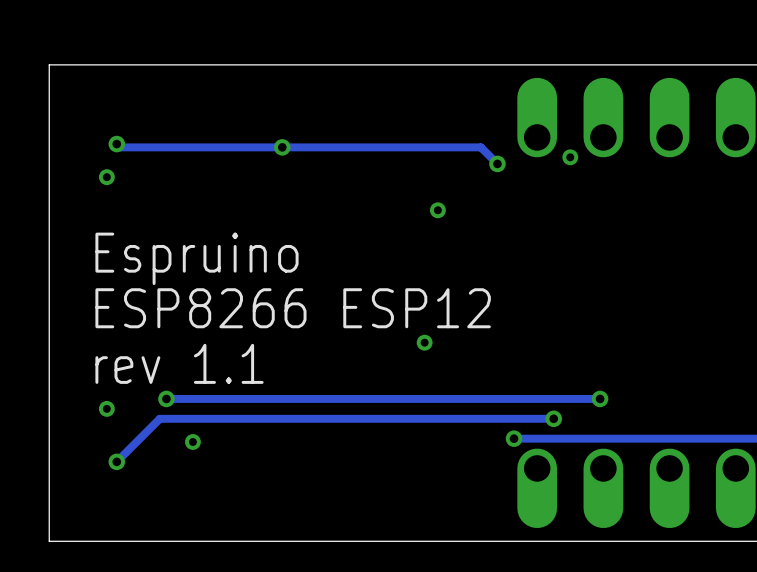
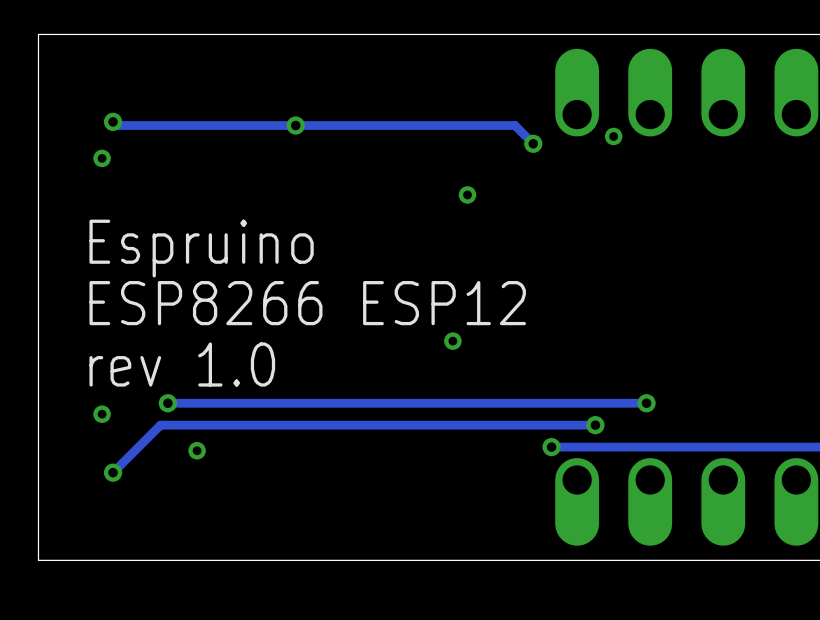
text: rev 1.1 (179, 363) -> rev 1.0 (182, 364)

